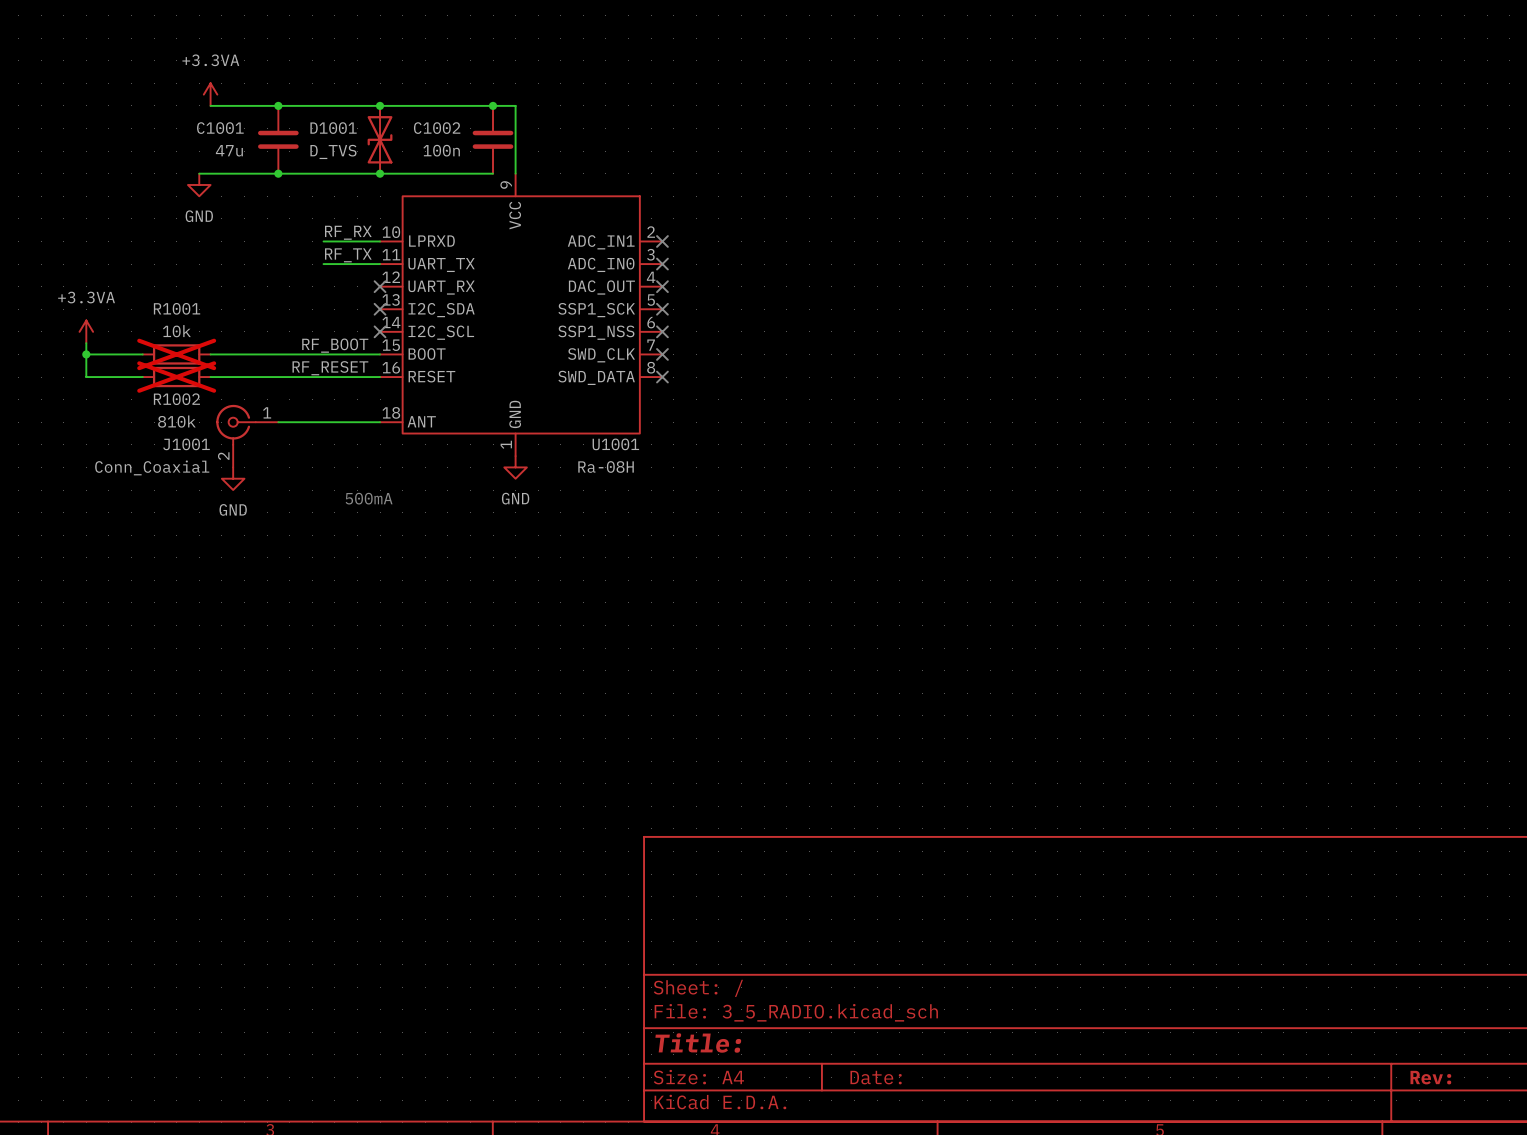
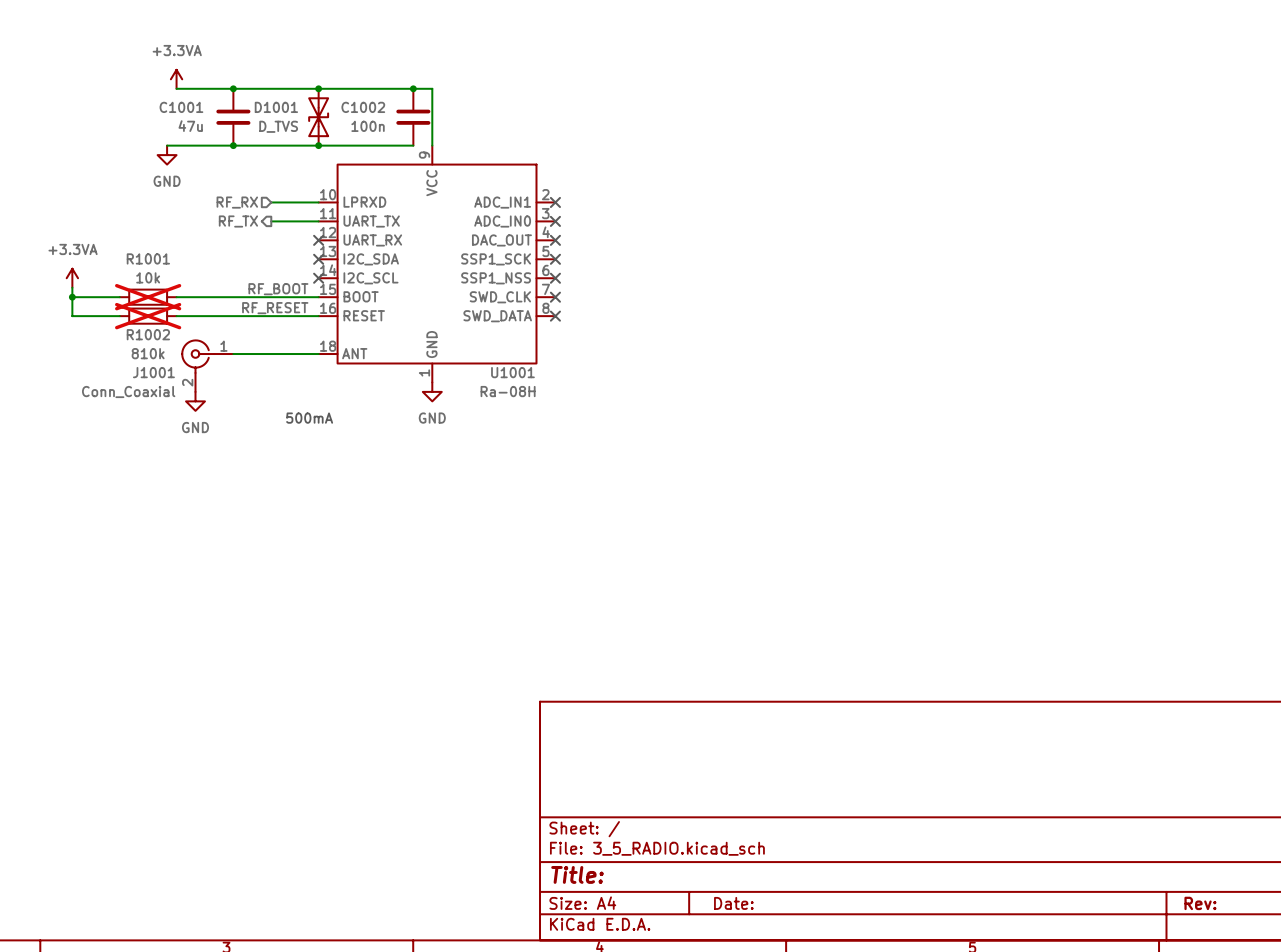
label: RF_RX (348, 232) -> none
hierarchical label: none -> RF_RX (237, 202)
label: RF_TX (348, 255) -> none
hierarchical label: none -> RF_TX (238, 221)

